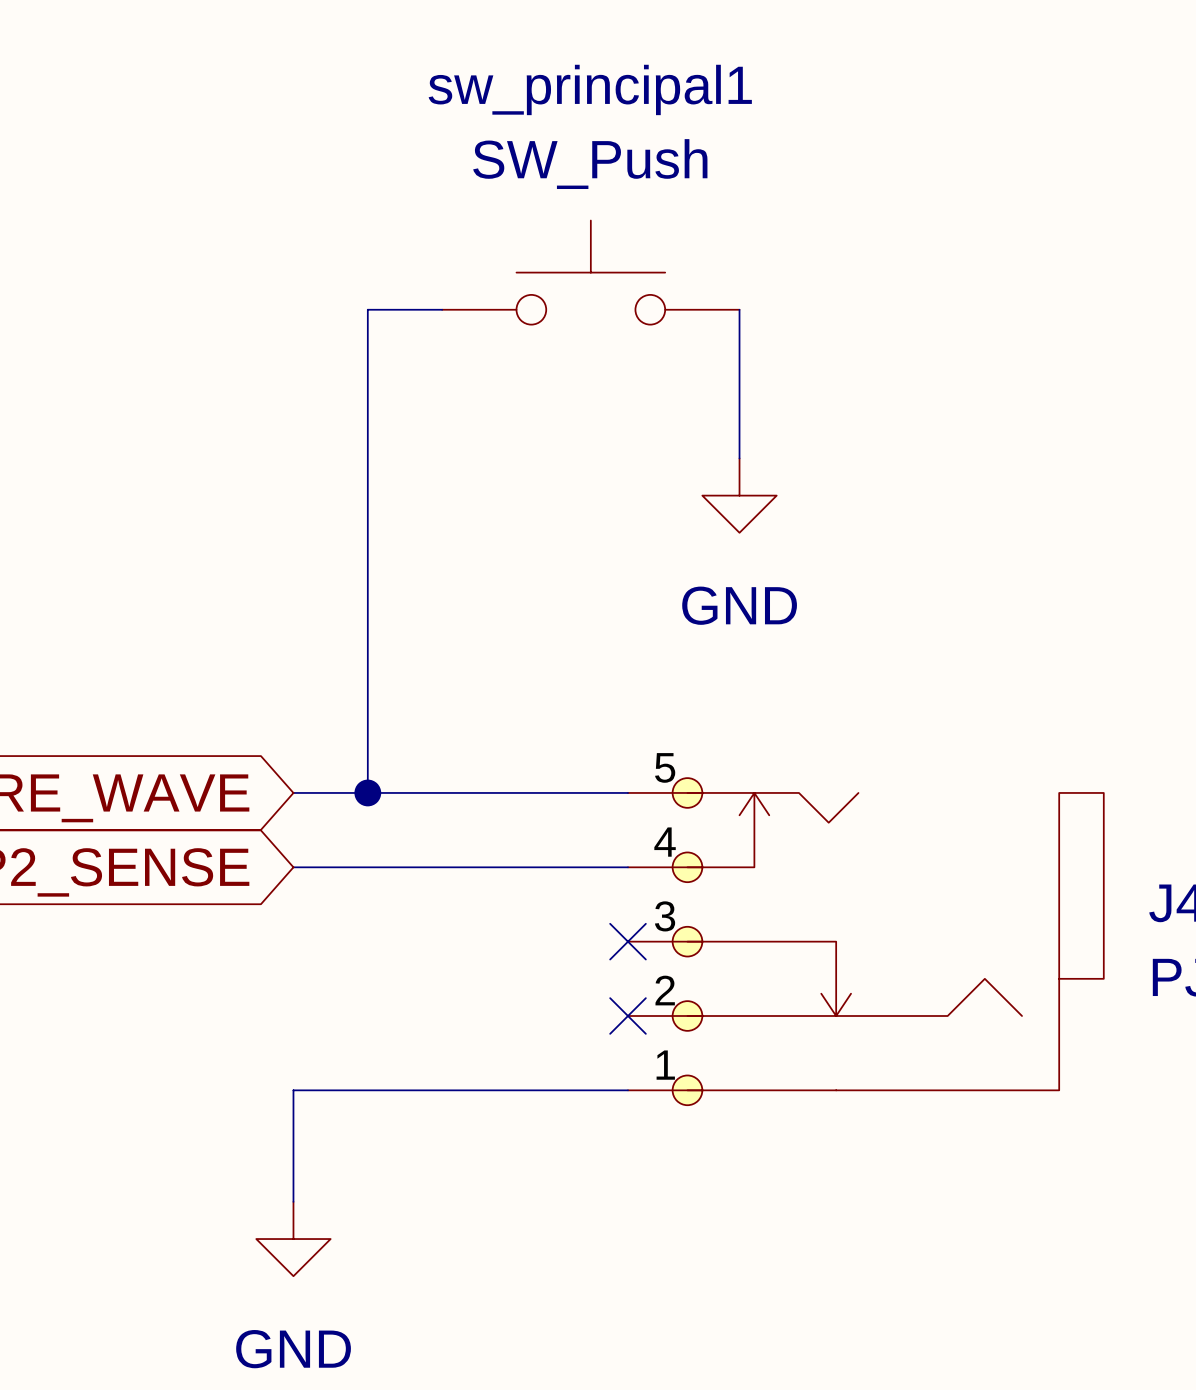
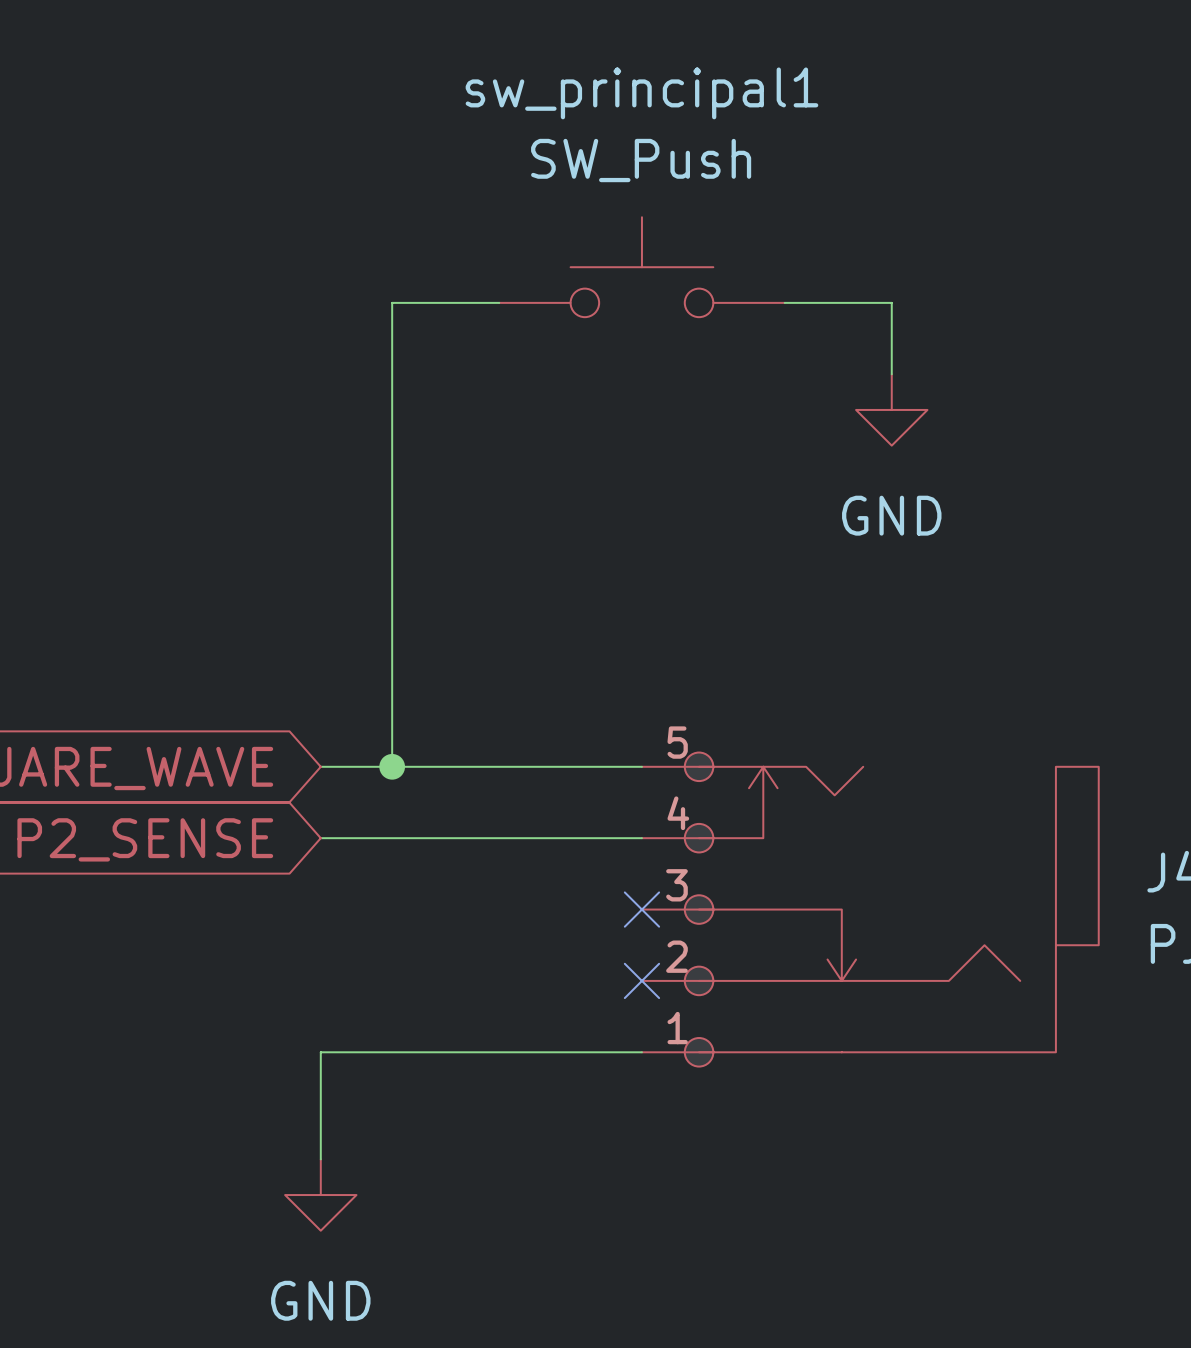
sw_principal1 position: (590, 272) -> (641, 267)
wire: (739, 309) (739, 458) -> none
wire: none -> (784, 302) (891, 302) (891, 374)
power symbol position: GND (739, 495) -> GND (891, 409)

